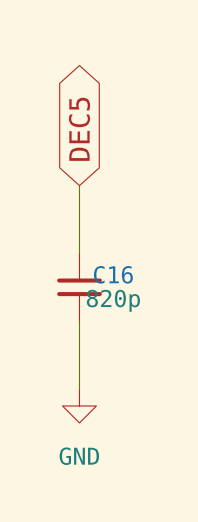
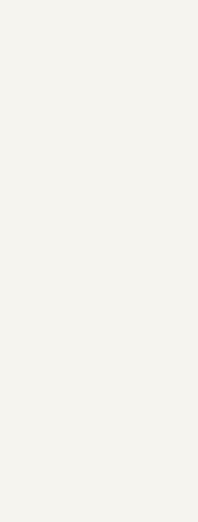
global label: DEC5 (79, 129) -> none
wire: (79, 185) (79, 253) -> none
C16: 820p (79, 287) -> none
wire: (79, 321) (79, 389) -> none
power symbol: GND (79, 405) -> none

